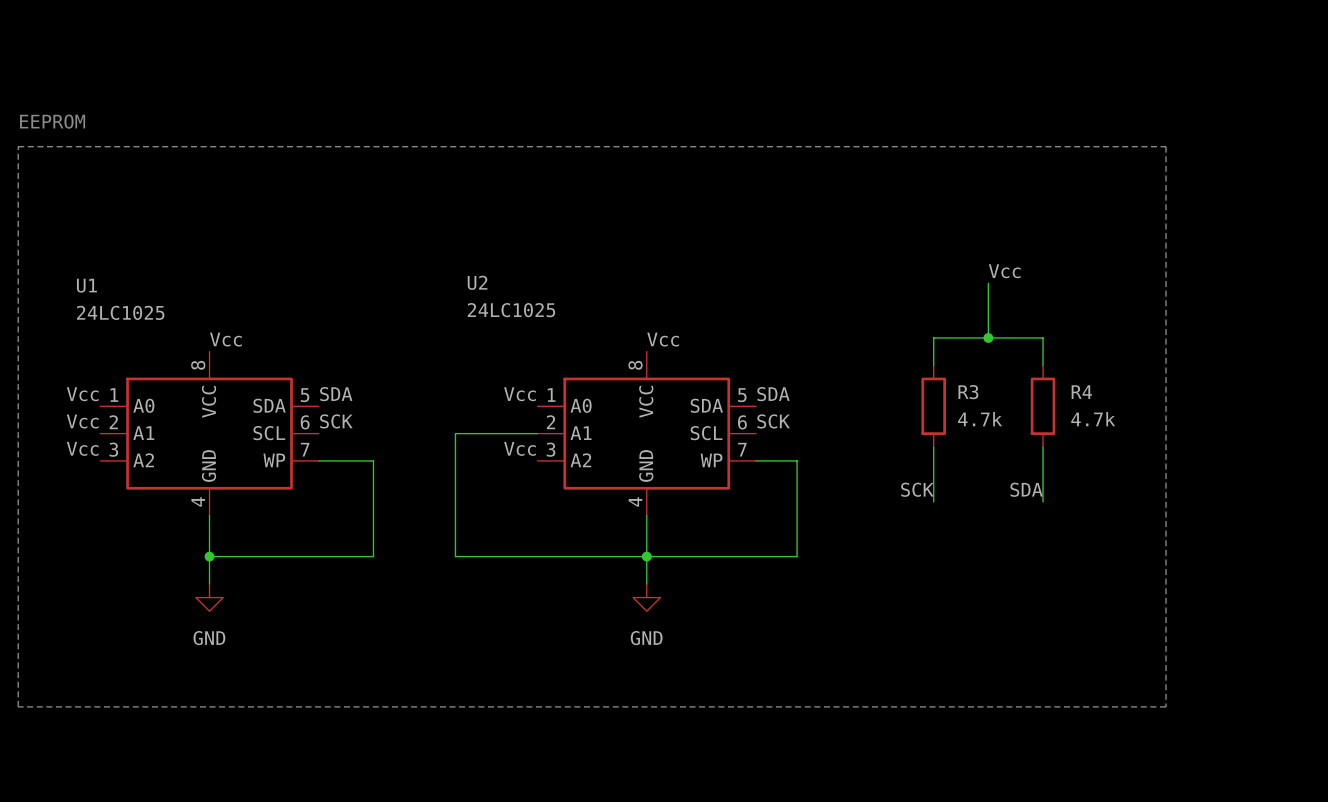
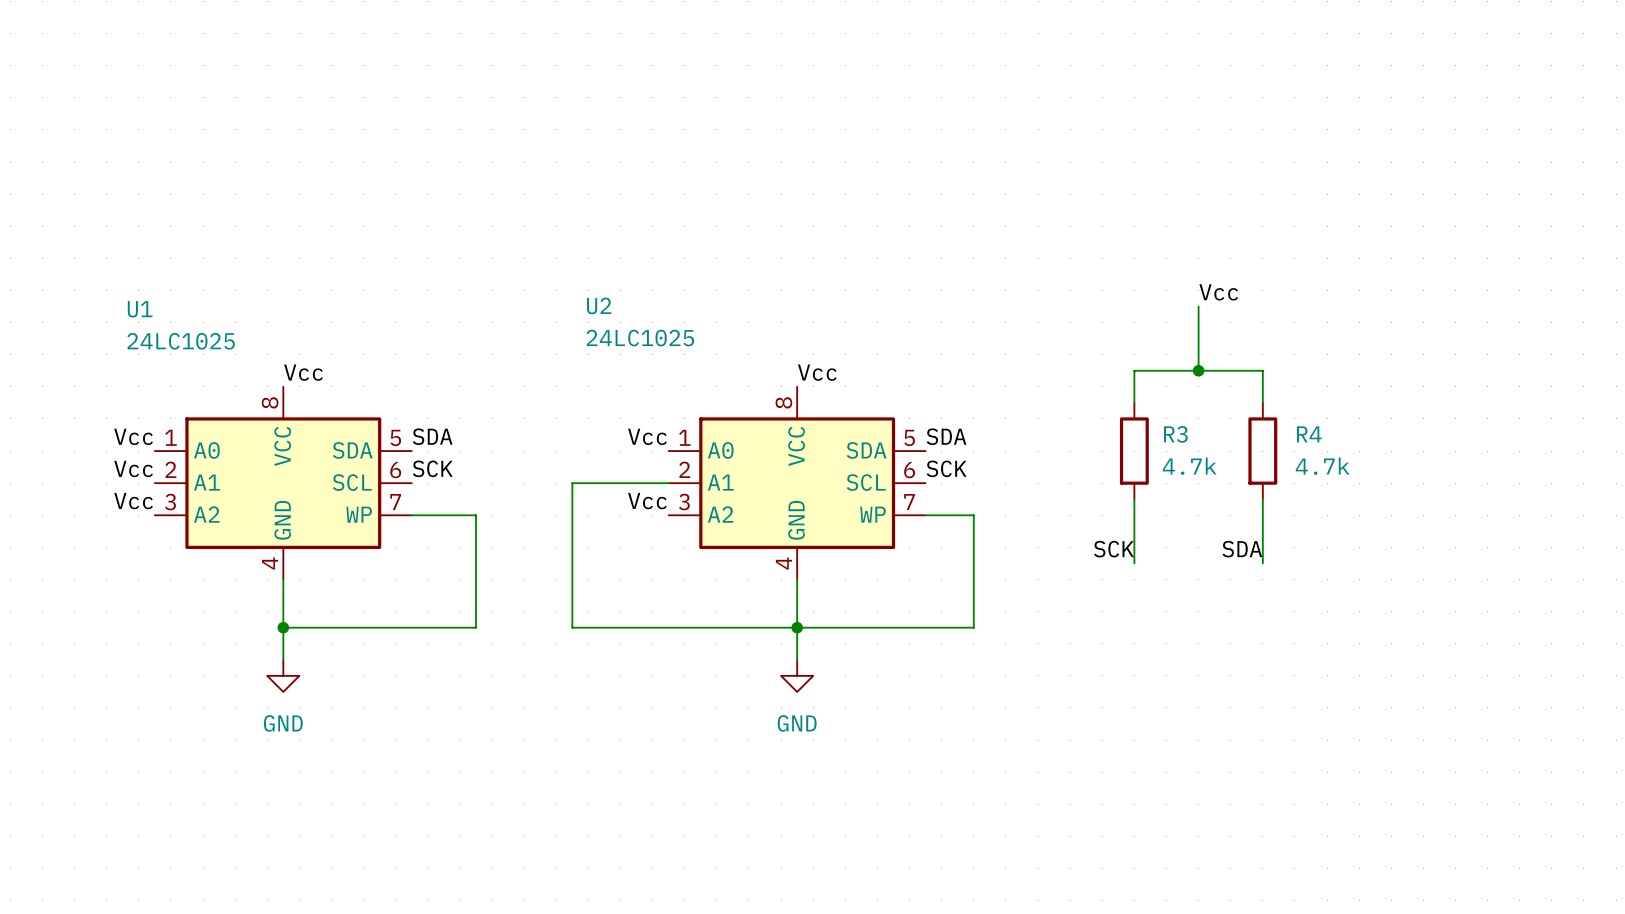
text: EEPROM (52, 121) -> none
line: (18, 146) (1165, 146) (1165, 706) (18, 706) (18, 146) -> none

